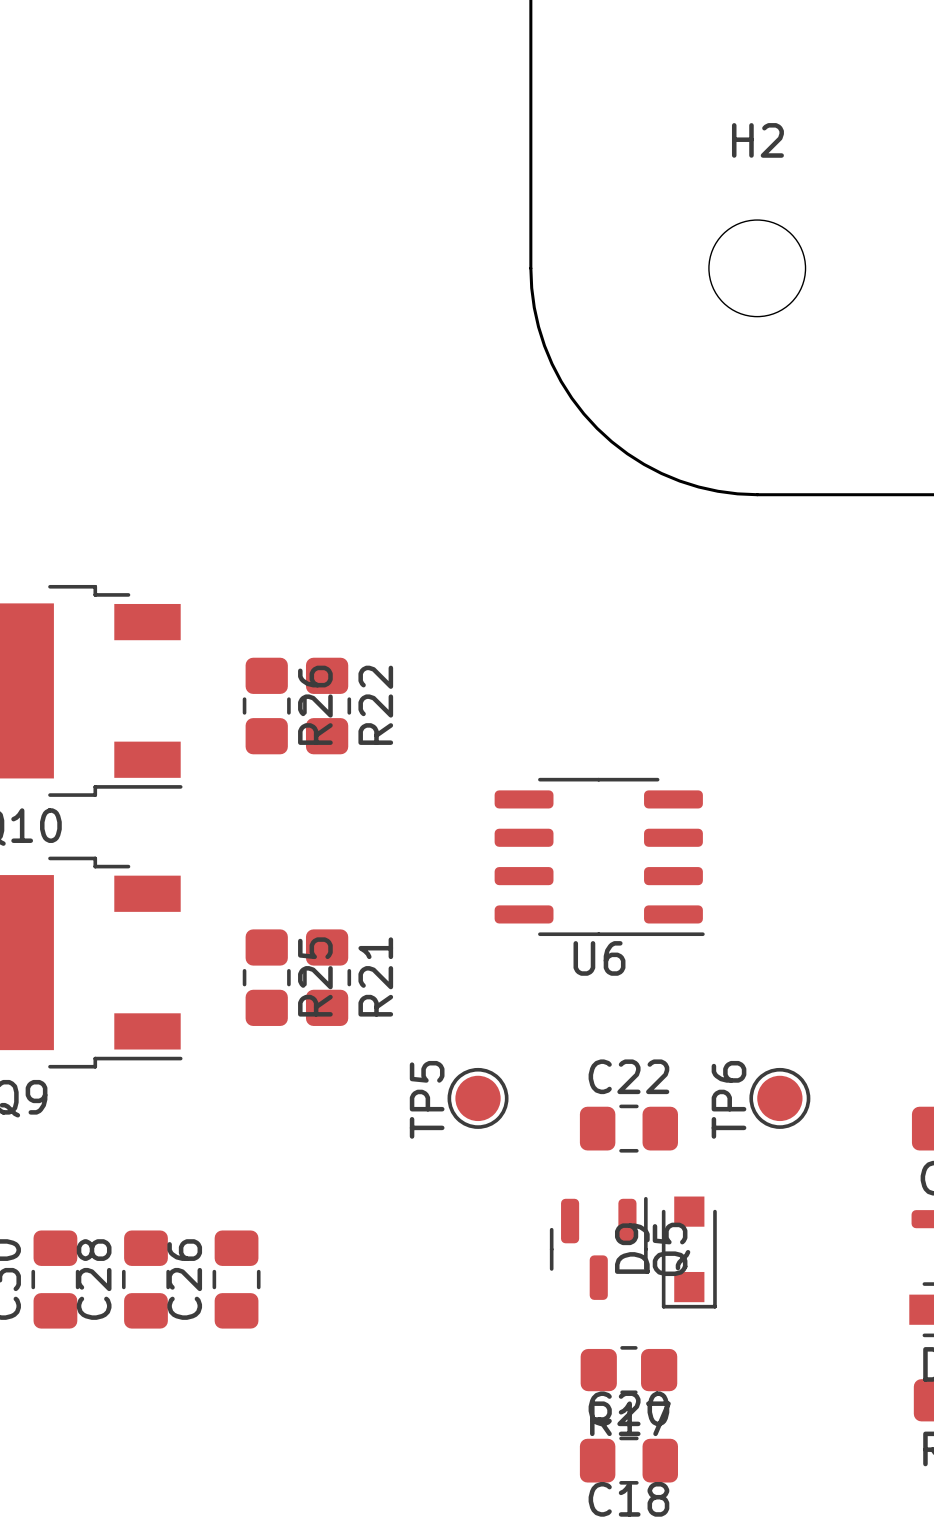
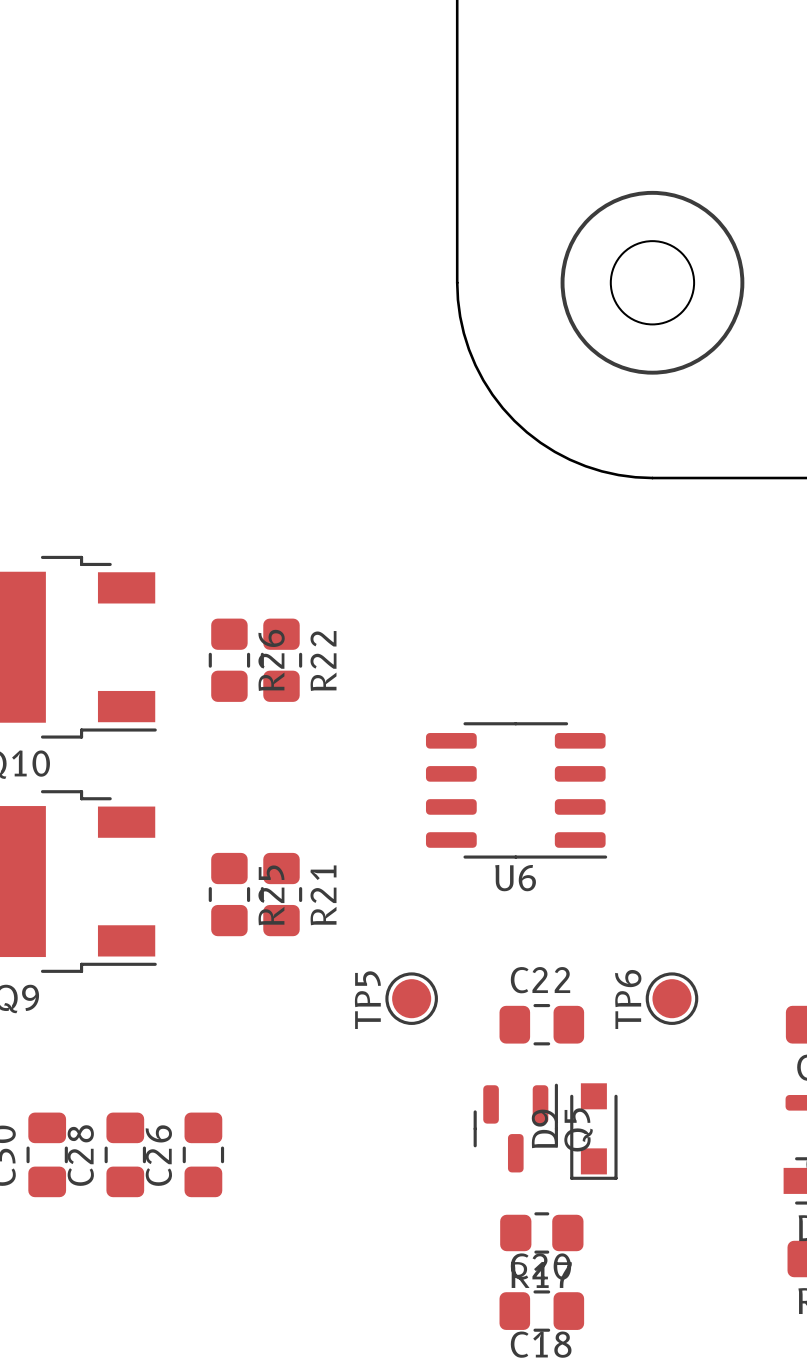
H2 name: H2 (757, 140) -> none
drawing: none -> [560, 190, 745, 375]

